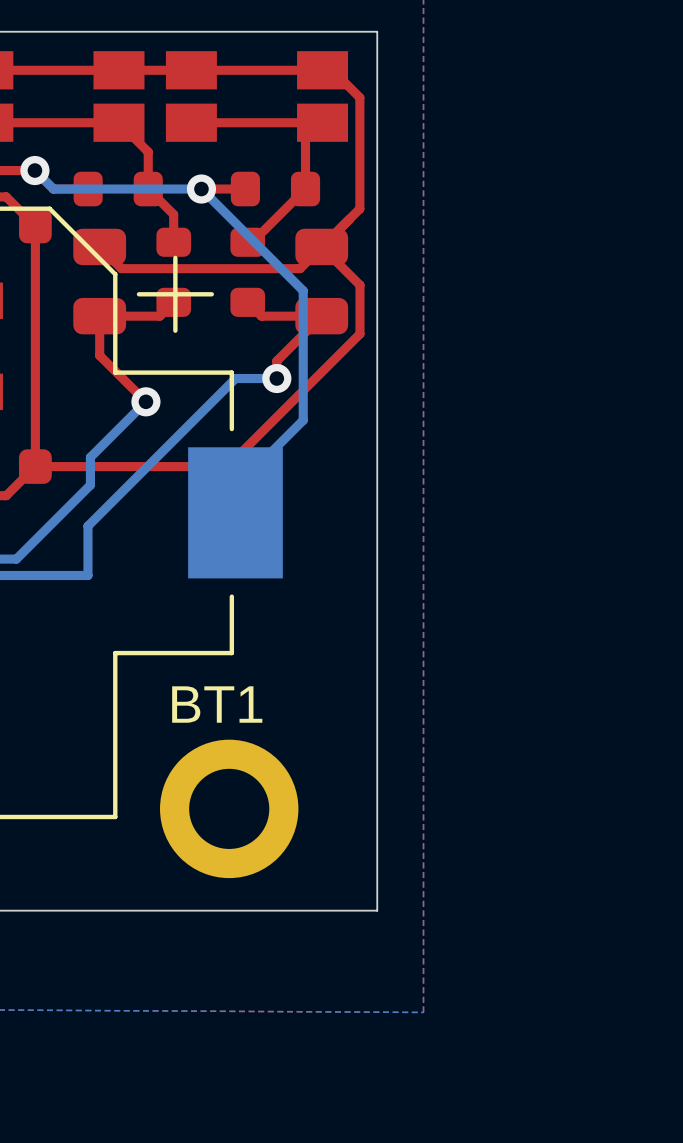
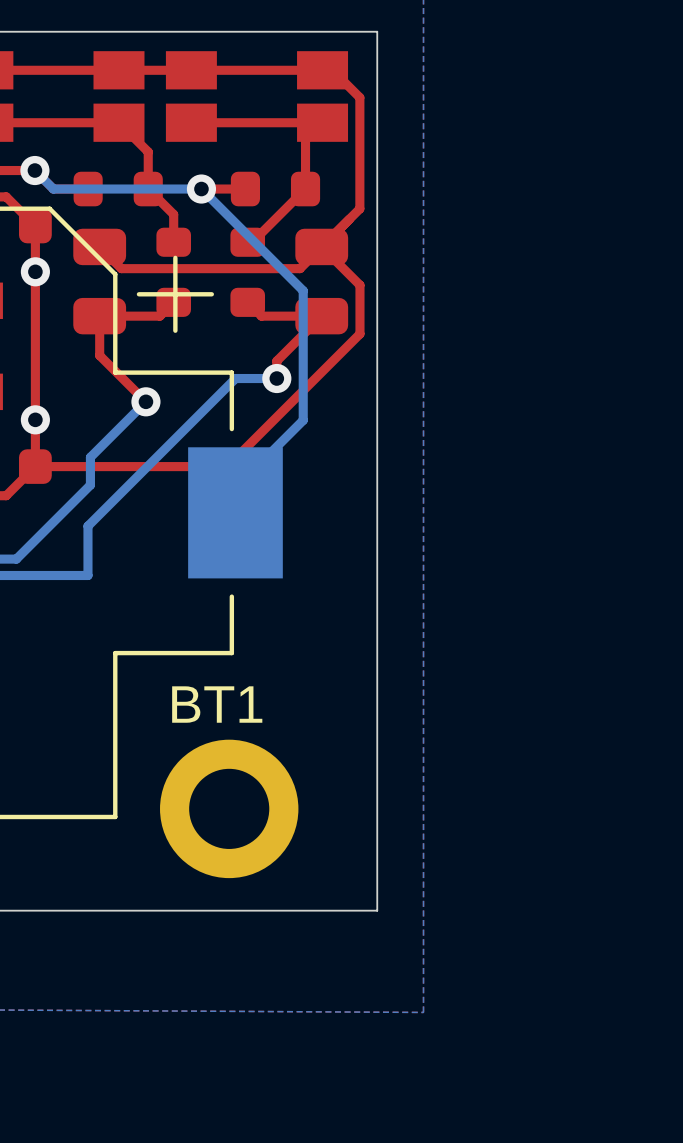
via: none -> (35, 271)
via: none -> (35, 419)

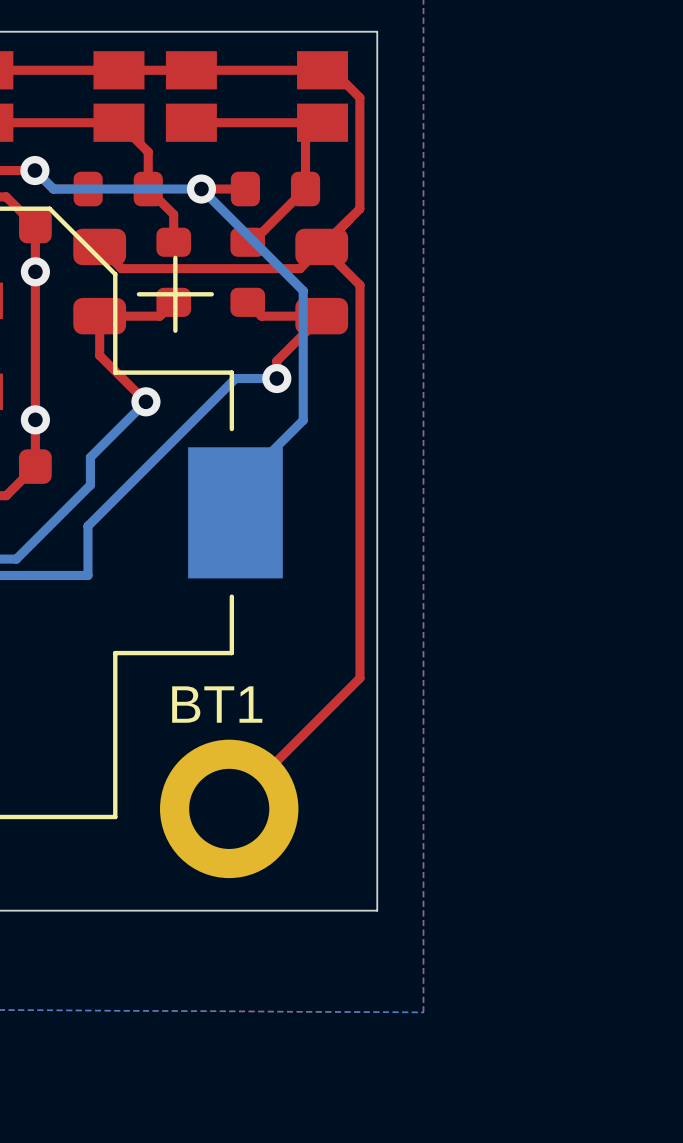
top track: (359, 333) (227, 466) (35, 466) -> (359, 333) (359, 678) (229, 808)

